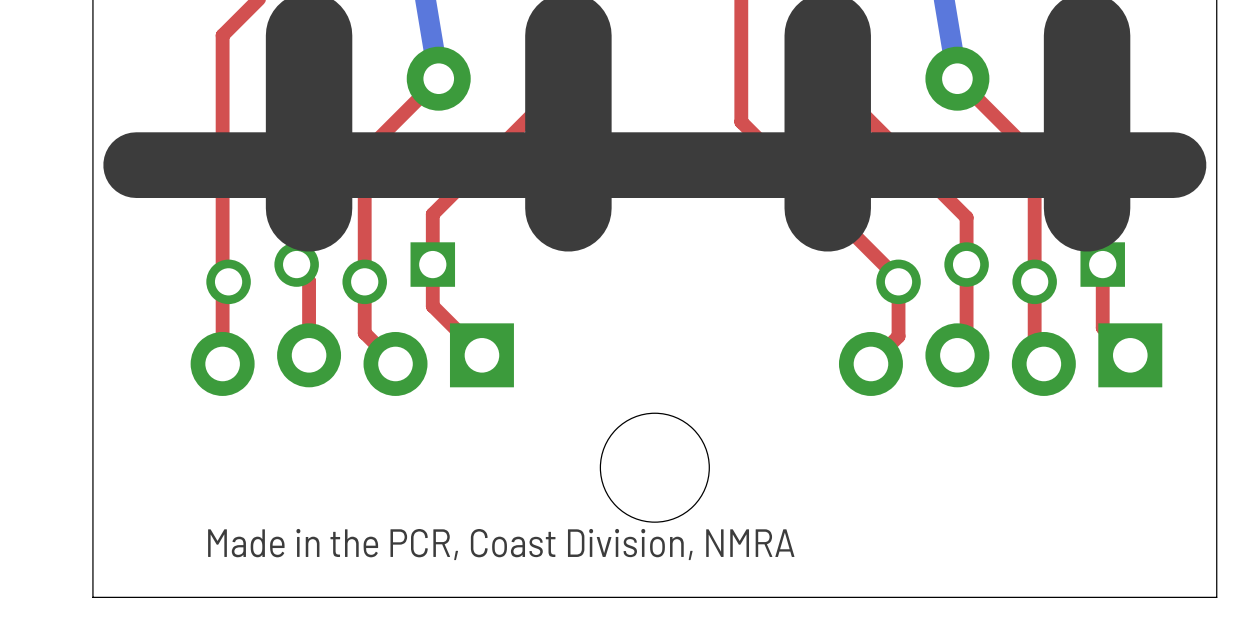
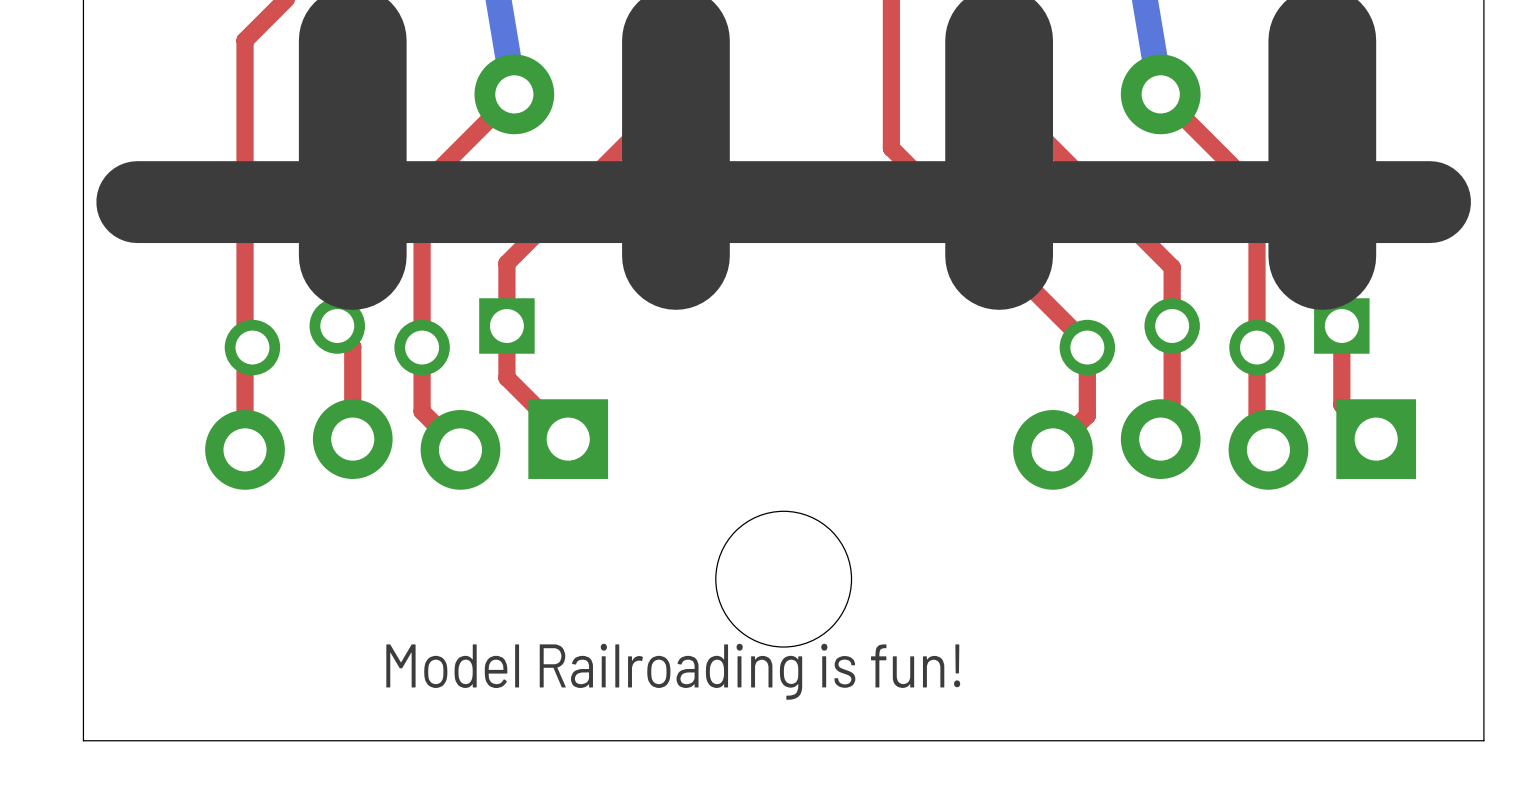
text: none -> Model Railroading is fun! (673, 671)
text: Made in the PCR, Coast Division, NMRA (501, 544) -> none

